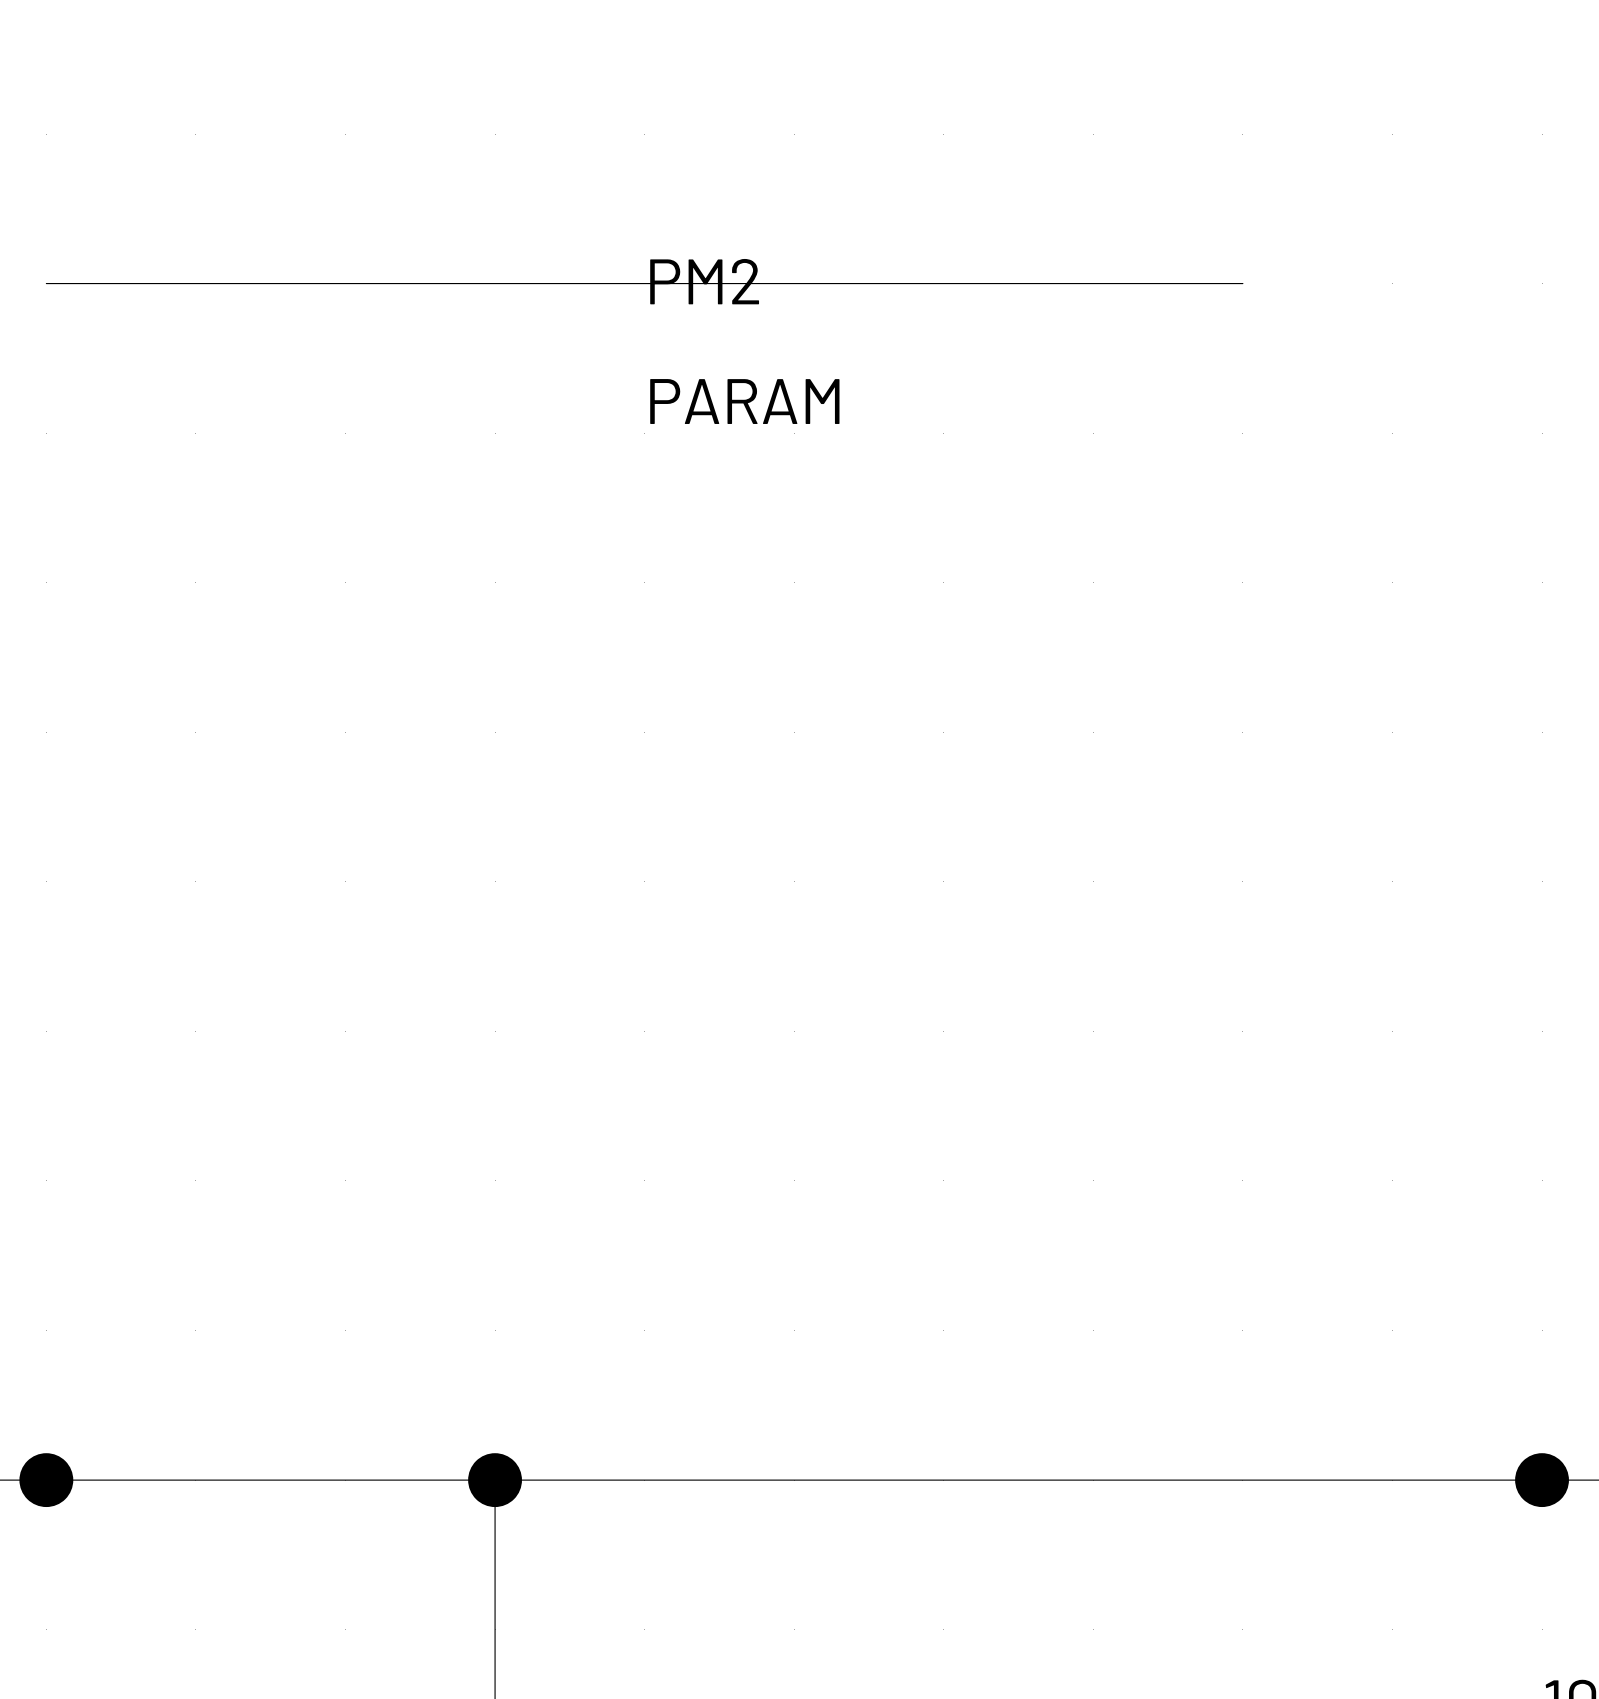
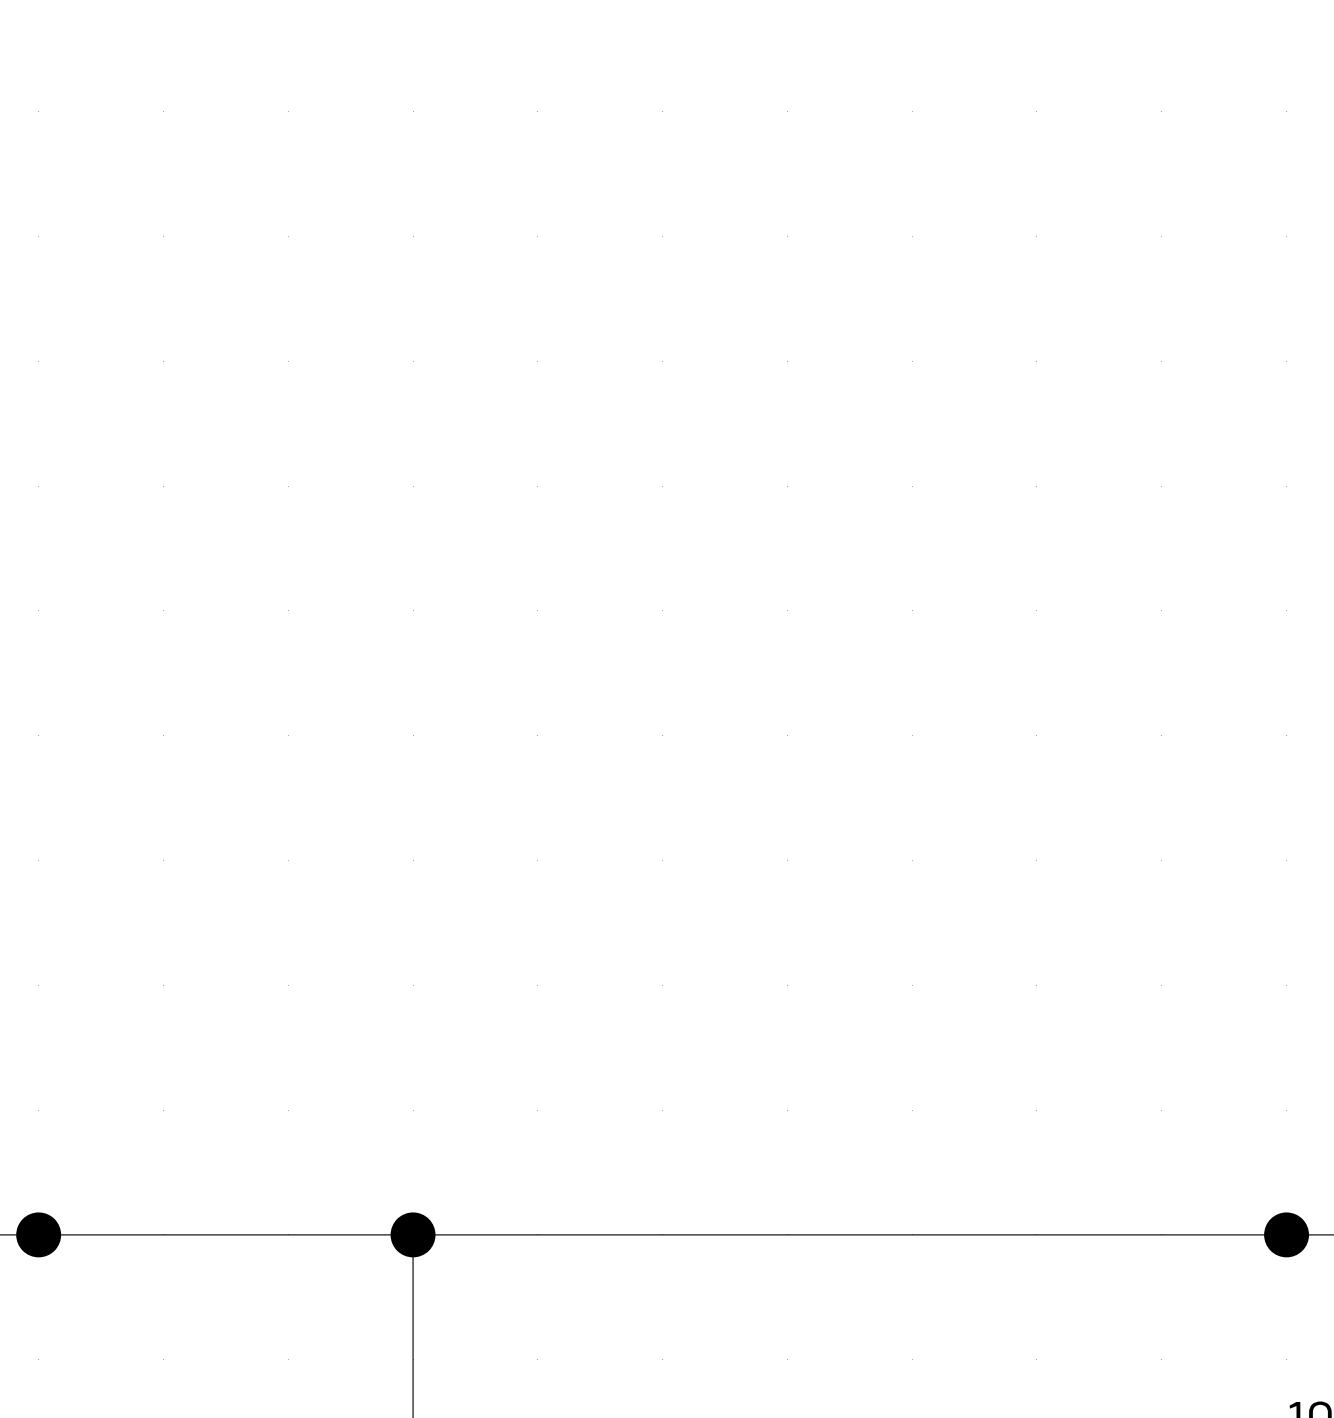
PM2: PARAM (644, 283) -> none

